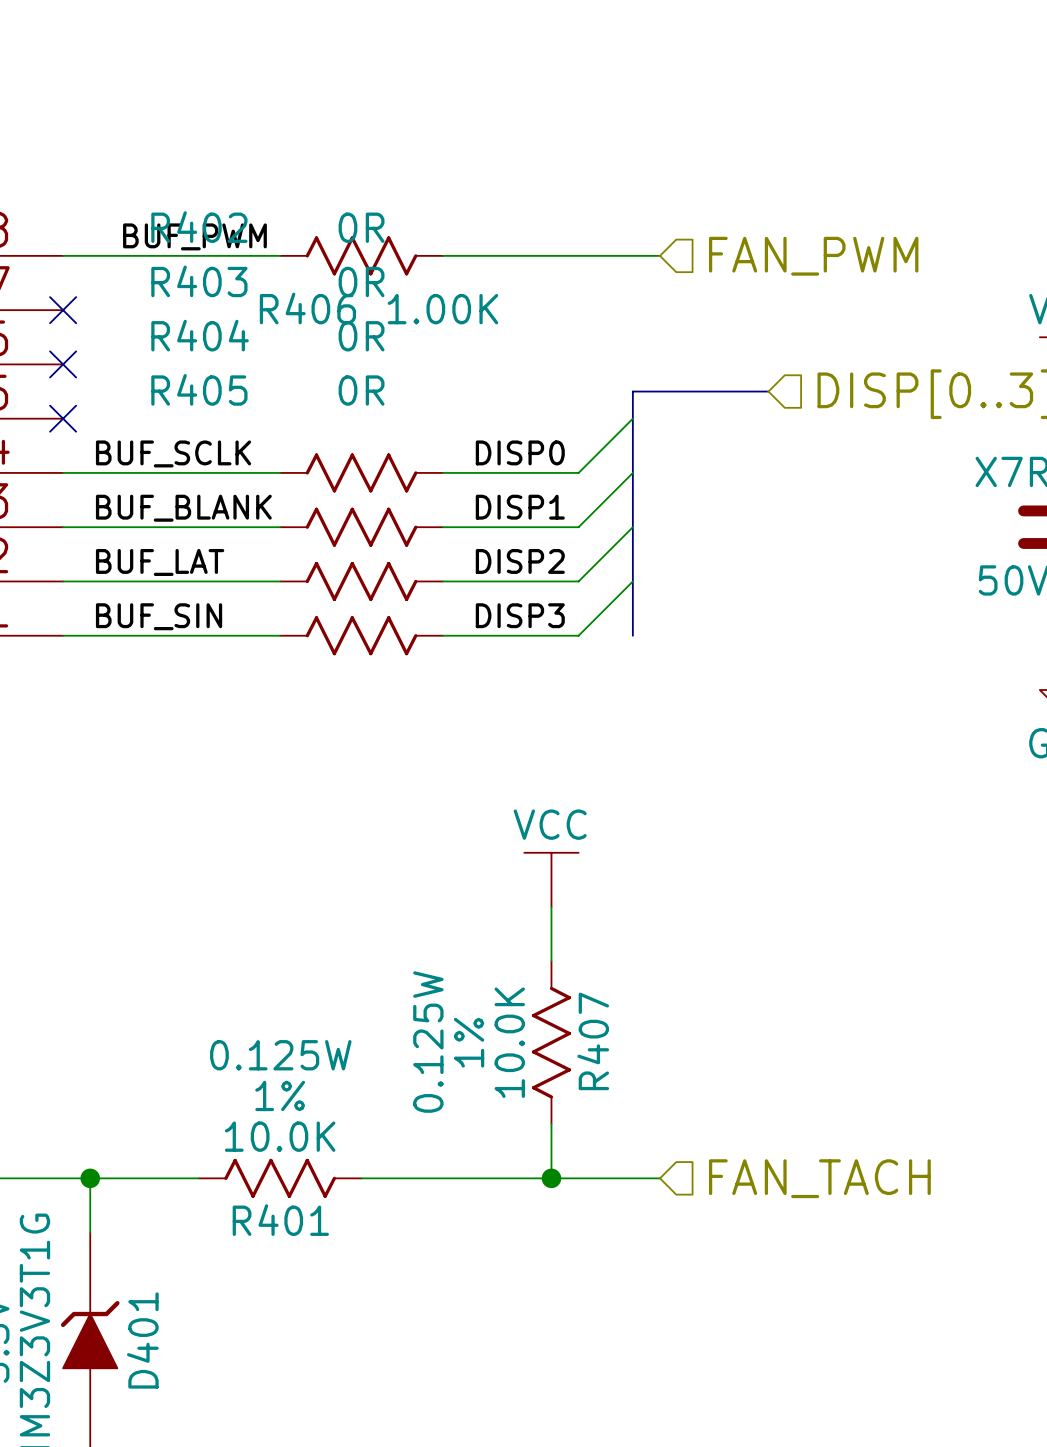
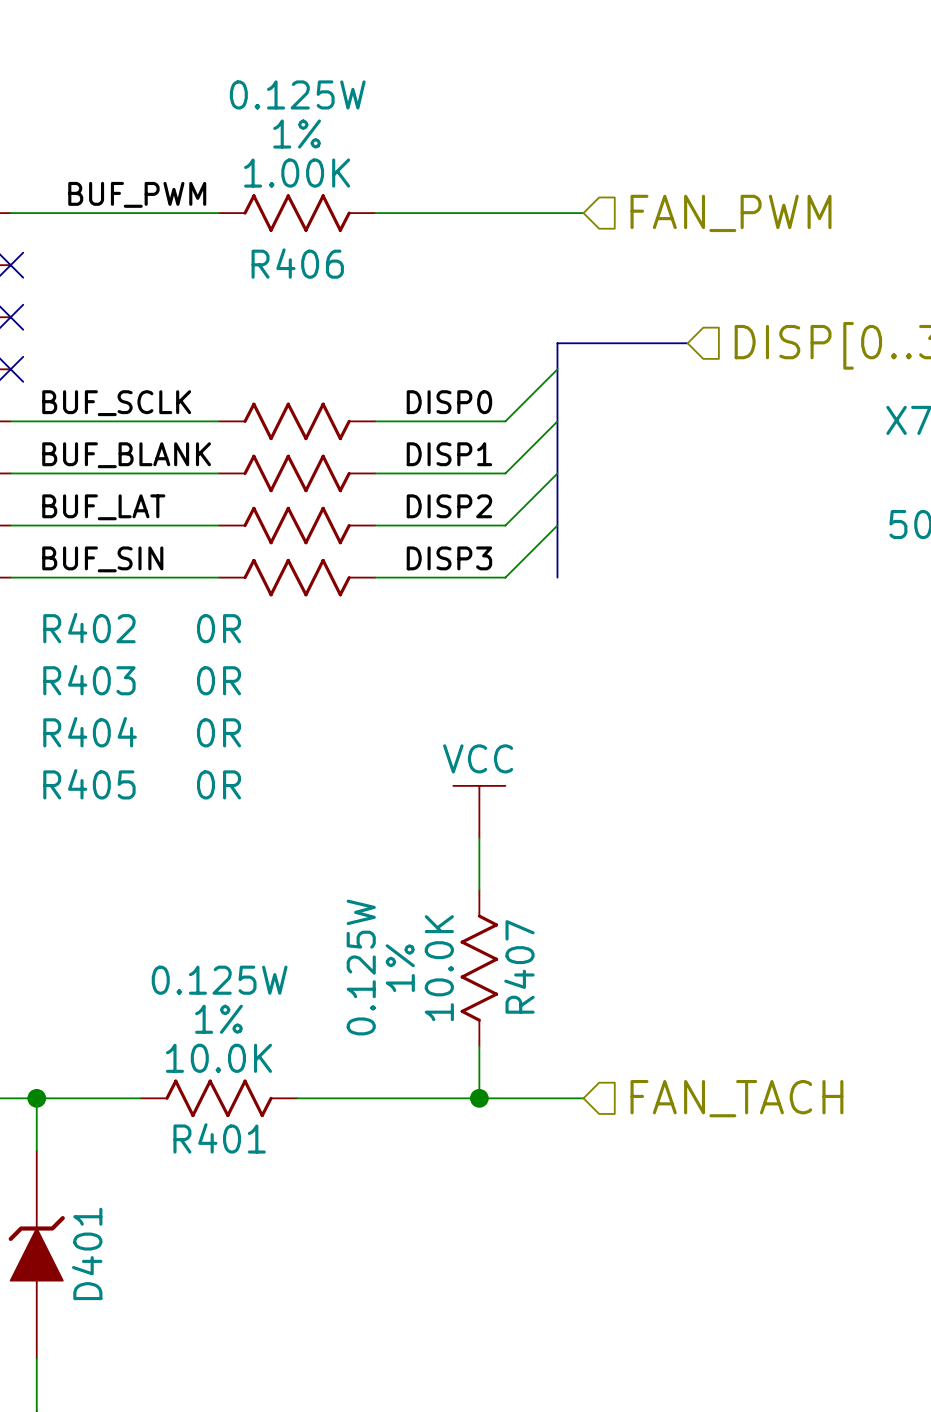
R406 text: none -> 0.125W (297, 94)
R406 text: none -> 1% (297, 134)
R402 name position: R402 (199, 227) -> R402 (89, 628)
R402 value position: 0R (361, 227) -> 0R (219, 628)
R403 name position: R403 (199, 281) -> R403 (89, 680)
R403 value position: 0R (361, 282) -> 0R (219, 680)
R406 name position: R406 (307, 308) -> R406 (297, 263)
R406 value position: 1.00K (442, 309) -> 1.00K (297, 173)
R404 name position: R404 (200, 335) -> R404 (90, 732)
R404 value position: 0R (361, 336) -> 0R (219, 732)
R405 name position: R405 (199, 389) -> R405 (89, 784)
R405 value position: 0R (361, 390) -> 0R (219, 784)

